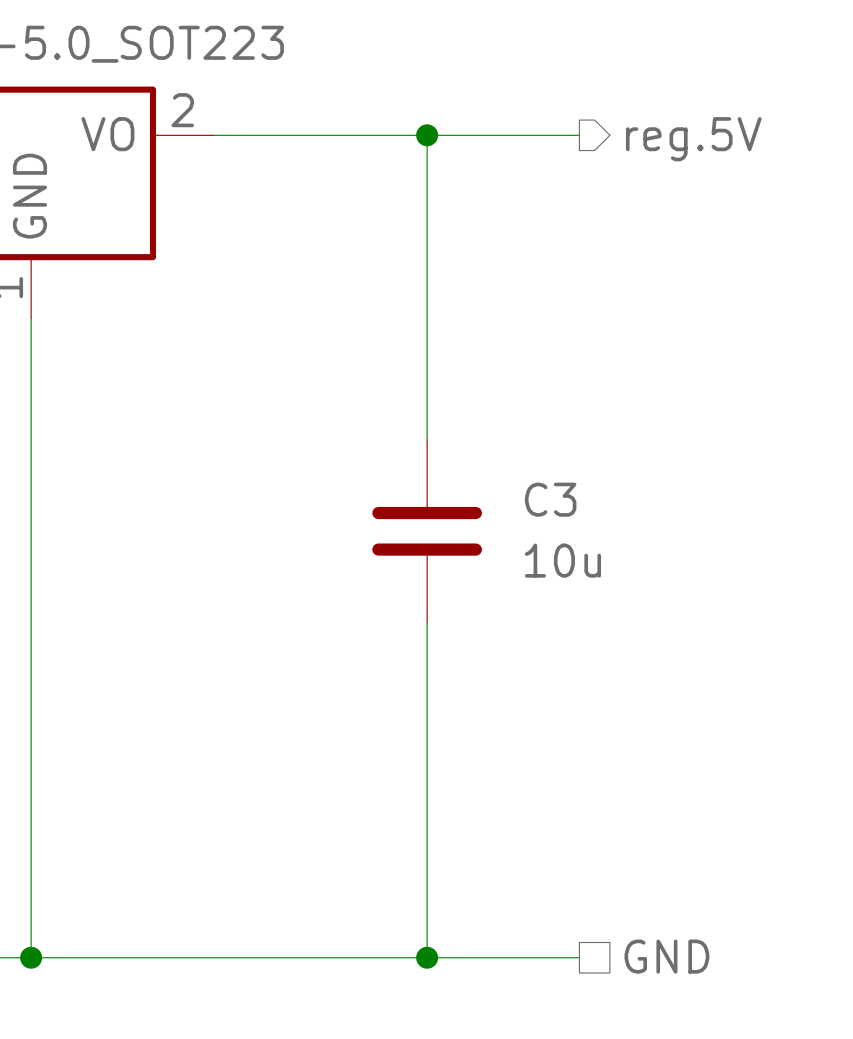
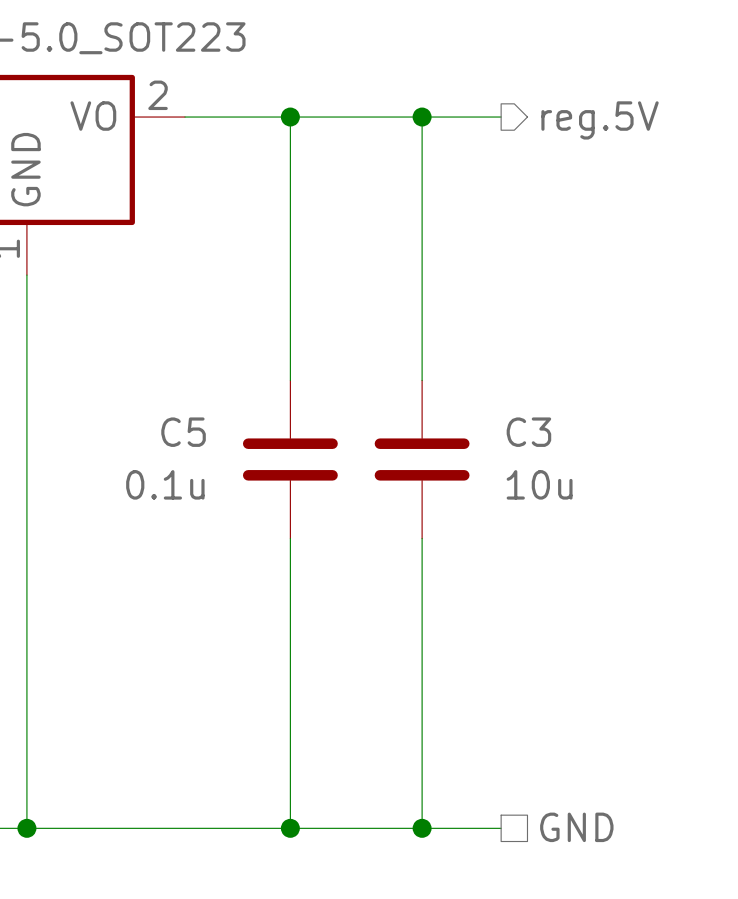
wire: none -> (290, 117) (290, 380)
junction: none -> (290, 117)
wire: (427, 135) (427, 439) -> (422, 117) (422, 380)
junction: (427, 135) -> none
junction: none -> (422, 117)
C5: none -> 0.1u (290, 459)
C3 position: (427, 531) -> (422, 459)
wire: none -> (290, 538) (290, 828)
wire: (427, 622) (427, 957) -> (422, 538) (422, 828)
junction: none -> (290, 828)
junction: (427, 957) -> none
junction: none -> (422, 828)

